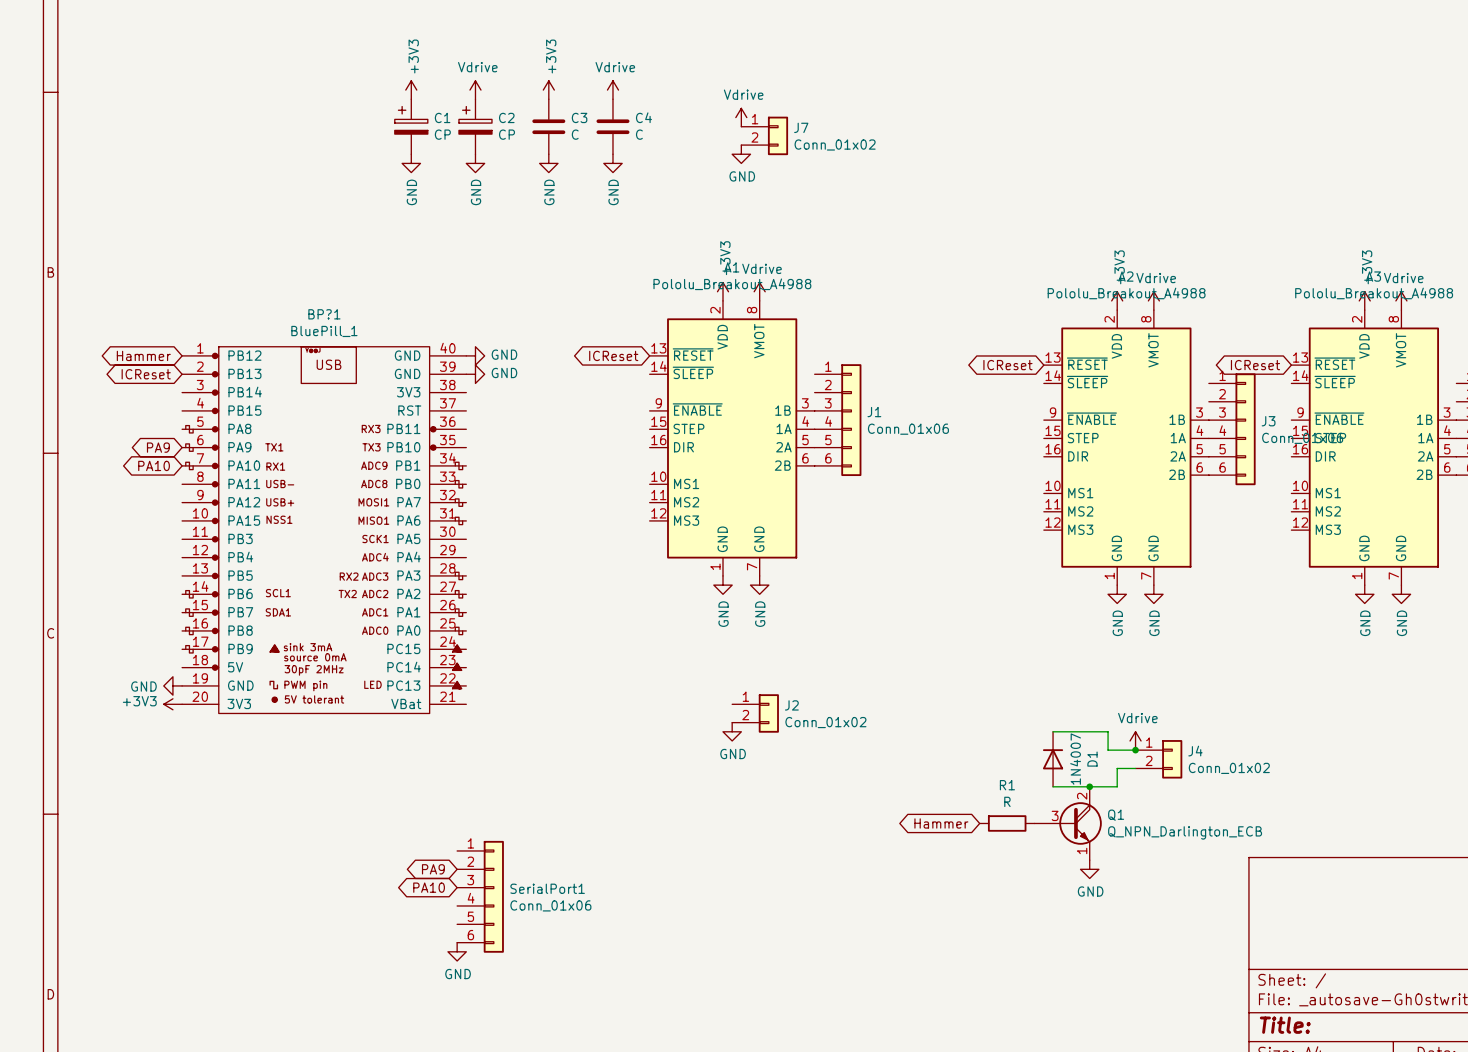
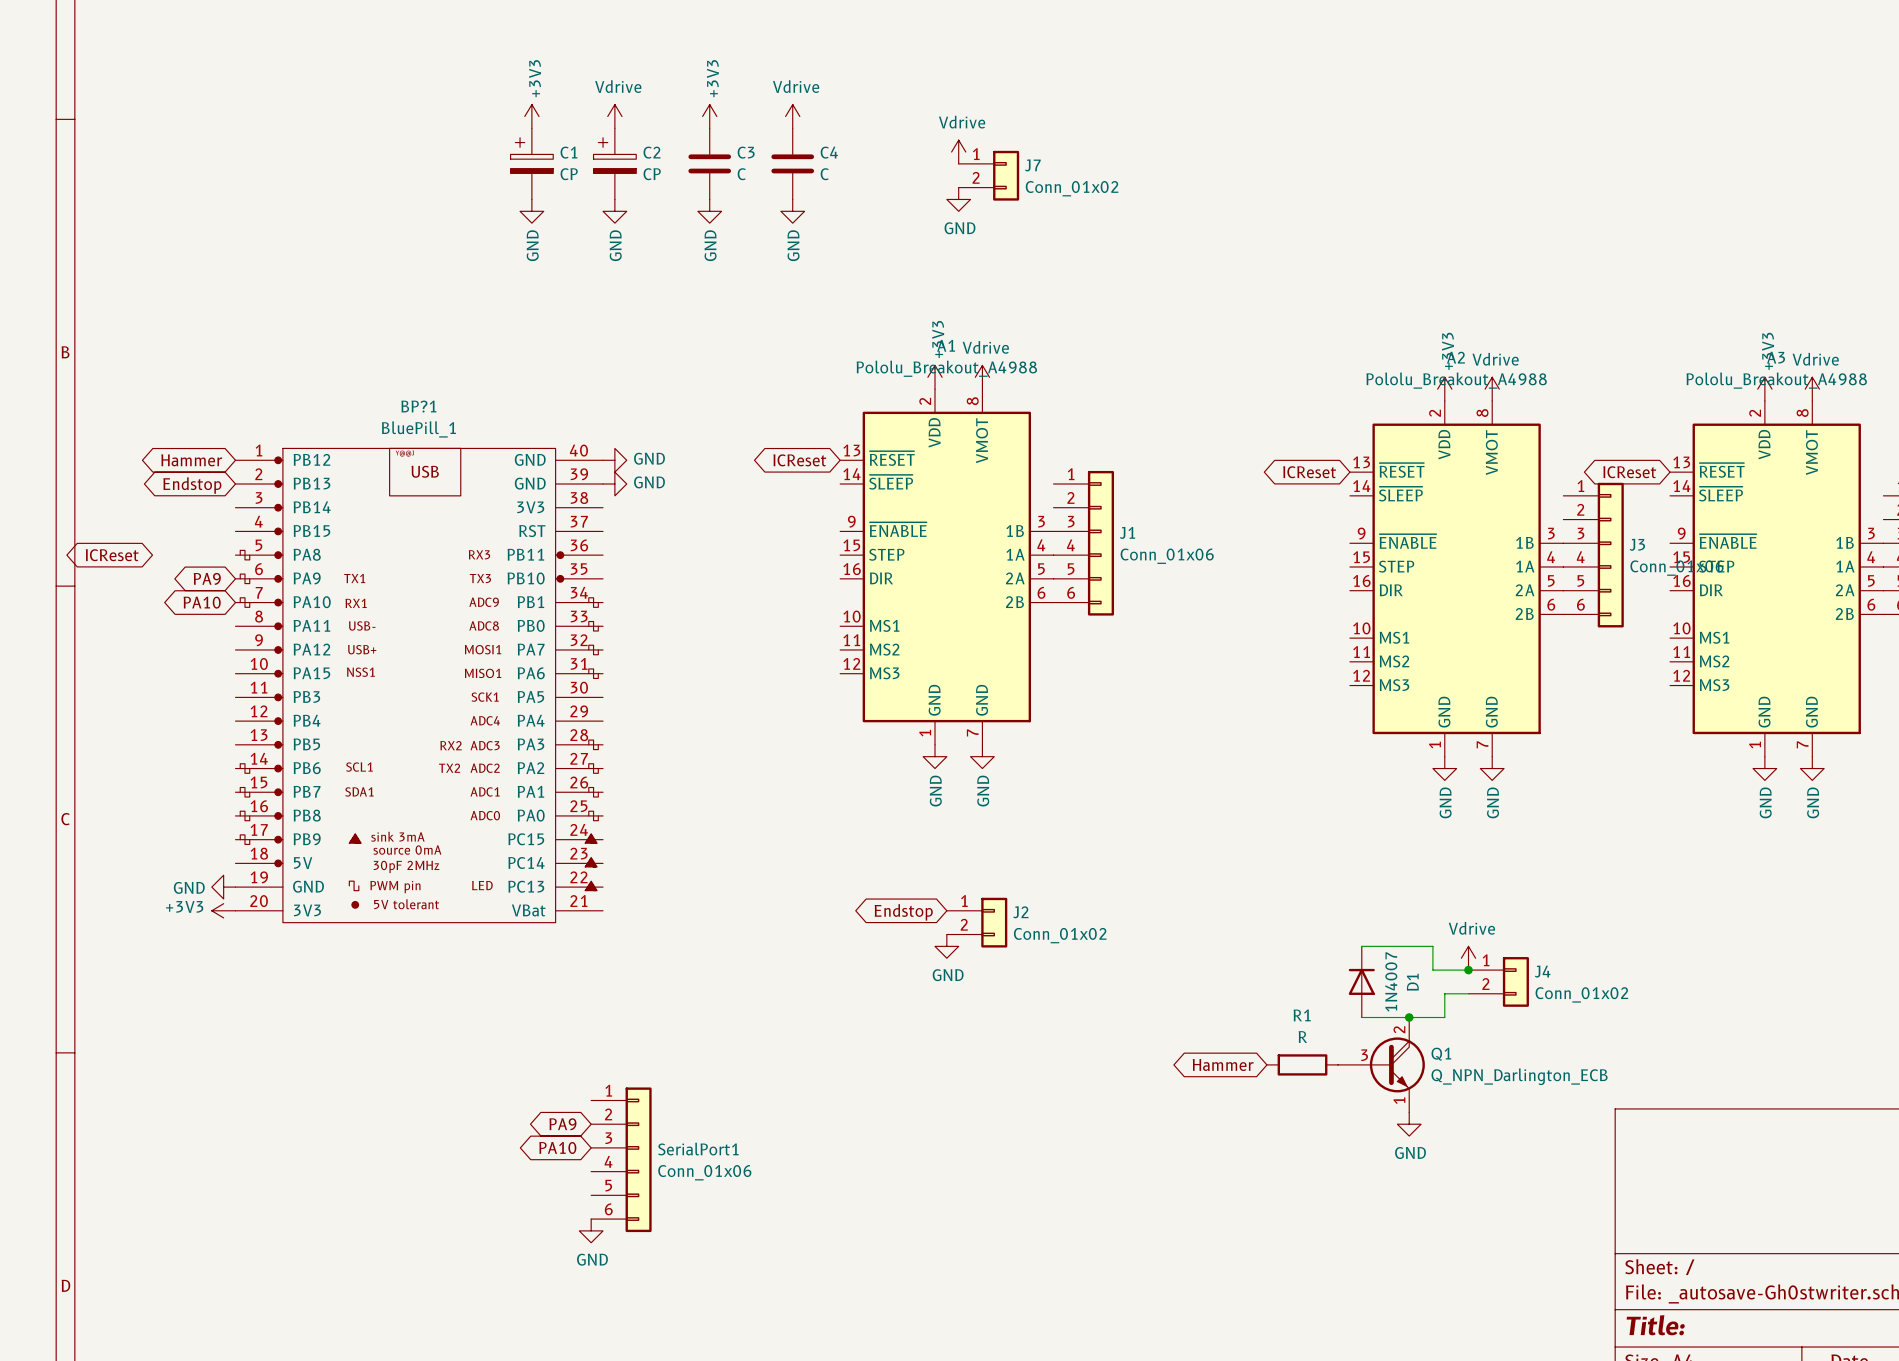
global label: ICReset (146, 374) -> Endstop (192, 485)
global label: none -> ICReset (112, 555)
global label: none -> Endstop (903, 912)

